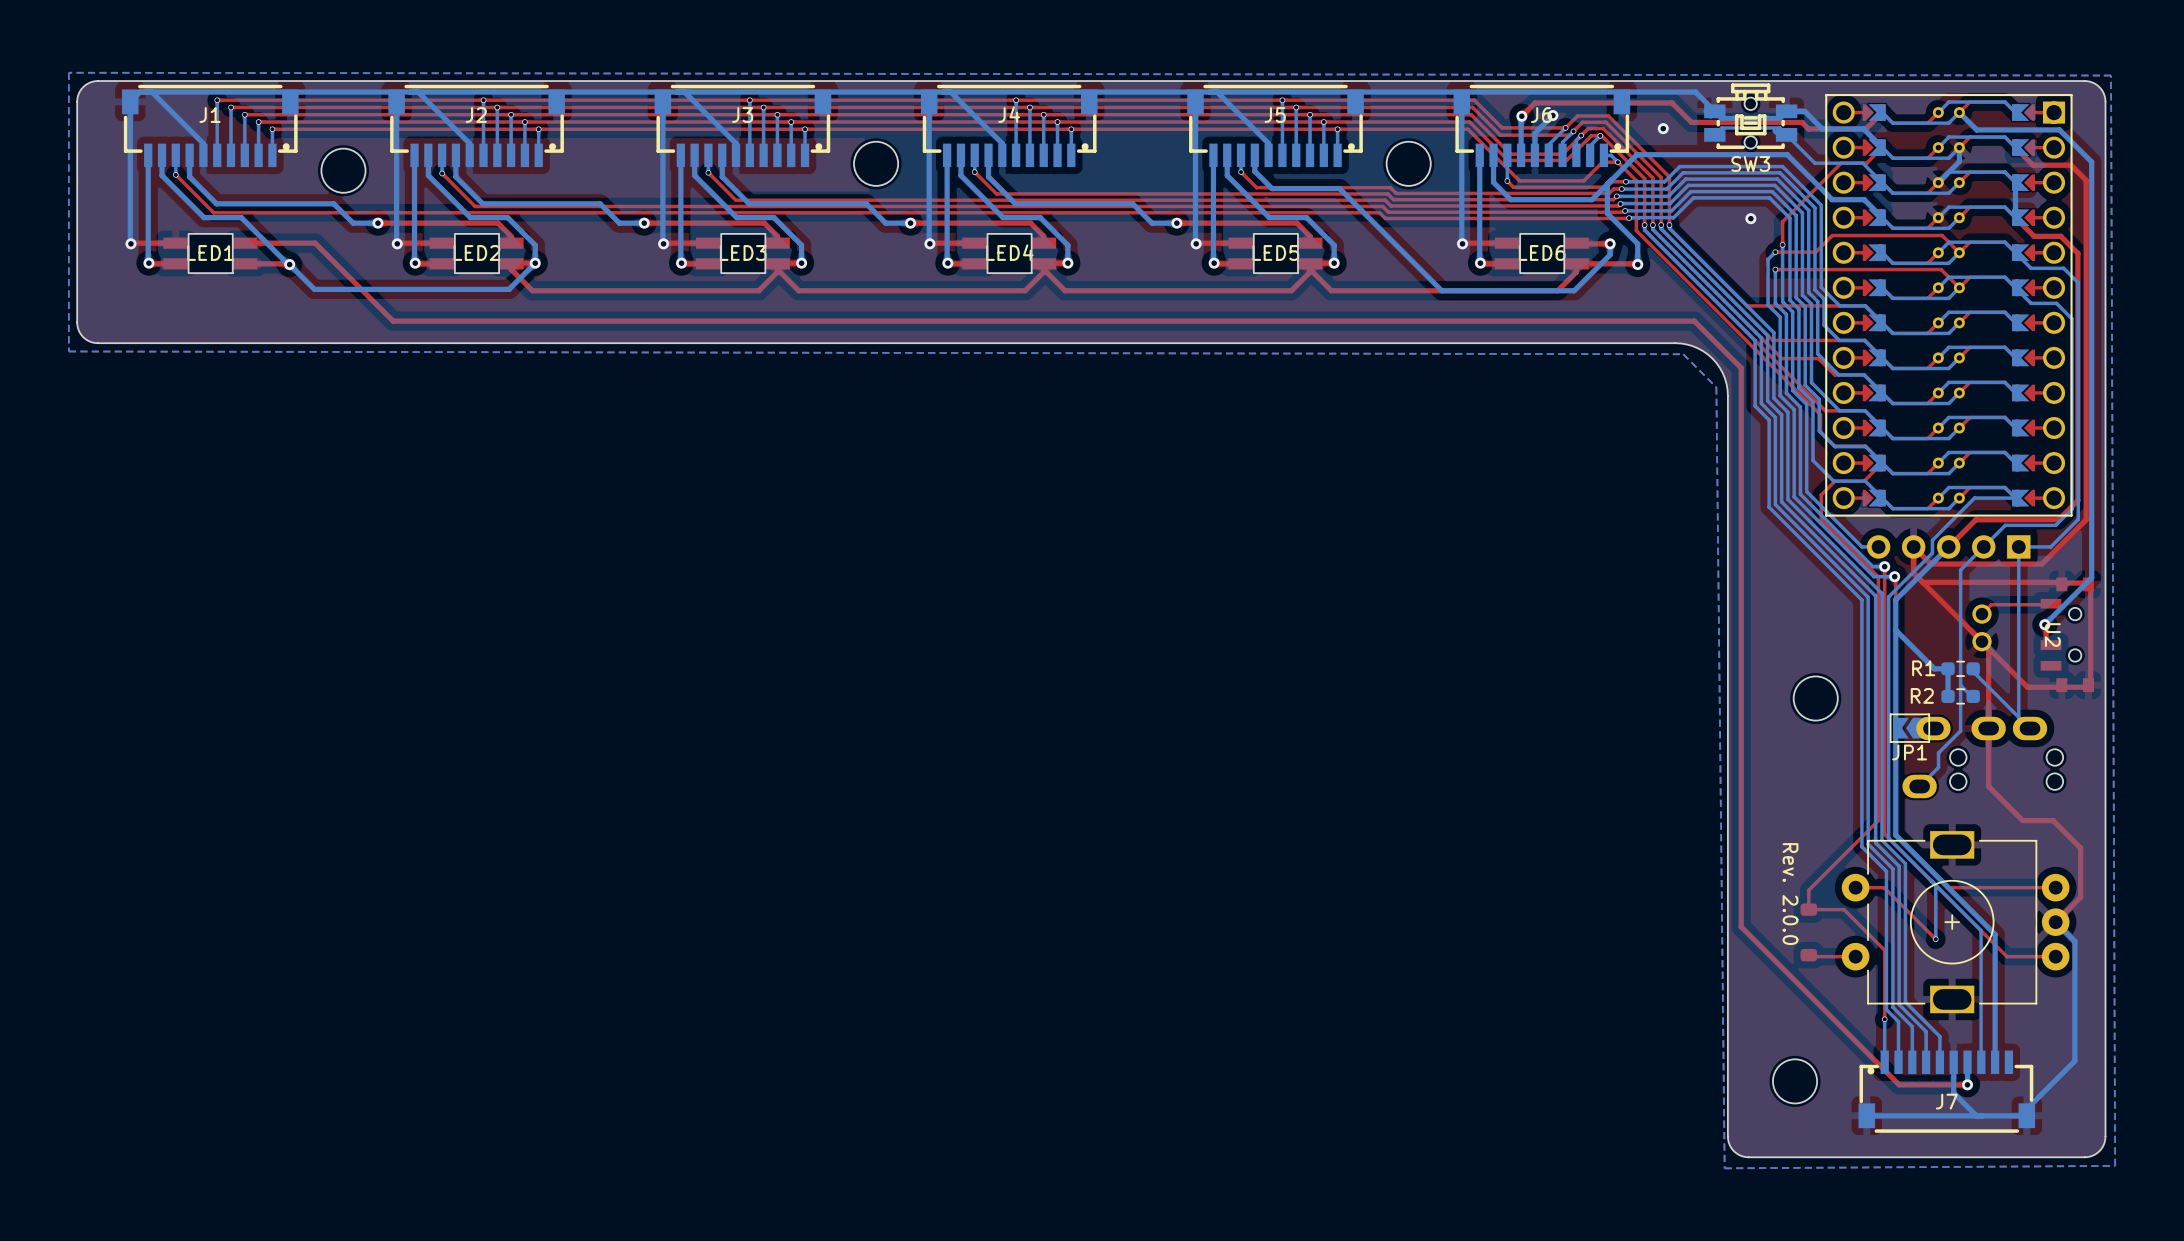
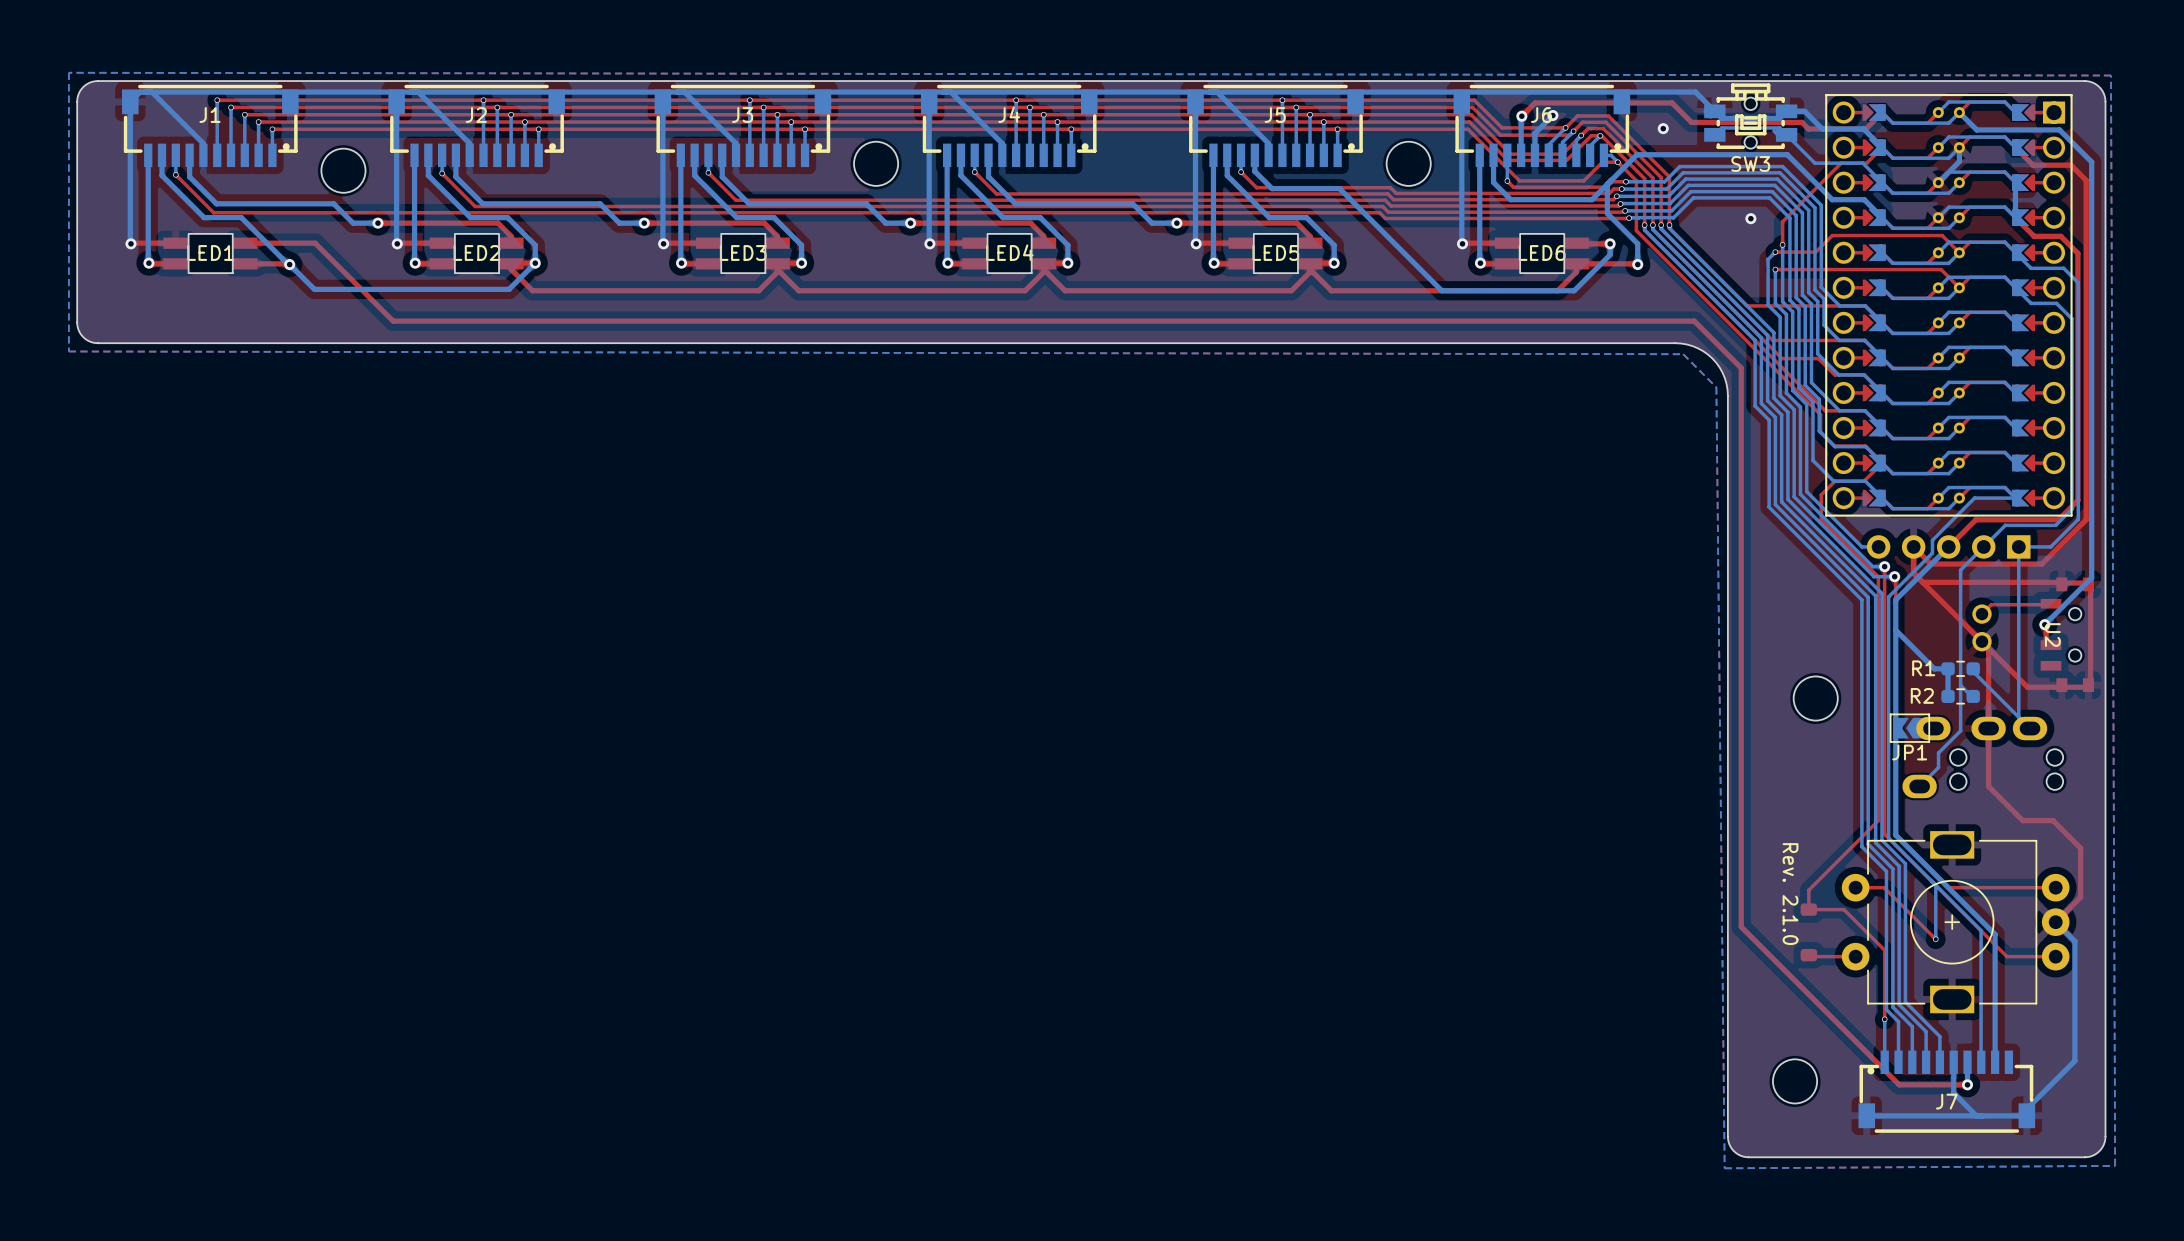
text: Rev. 2.0.0 (1790, 894) -> Rev. 2.1.0 (1790, 894)

